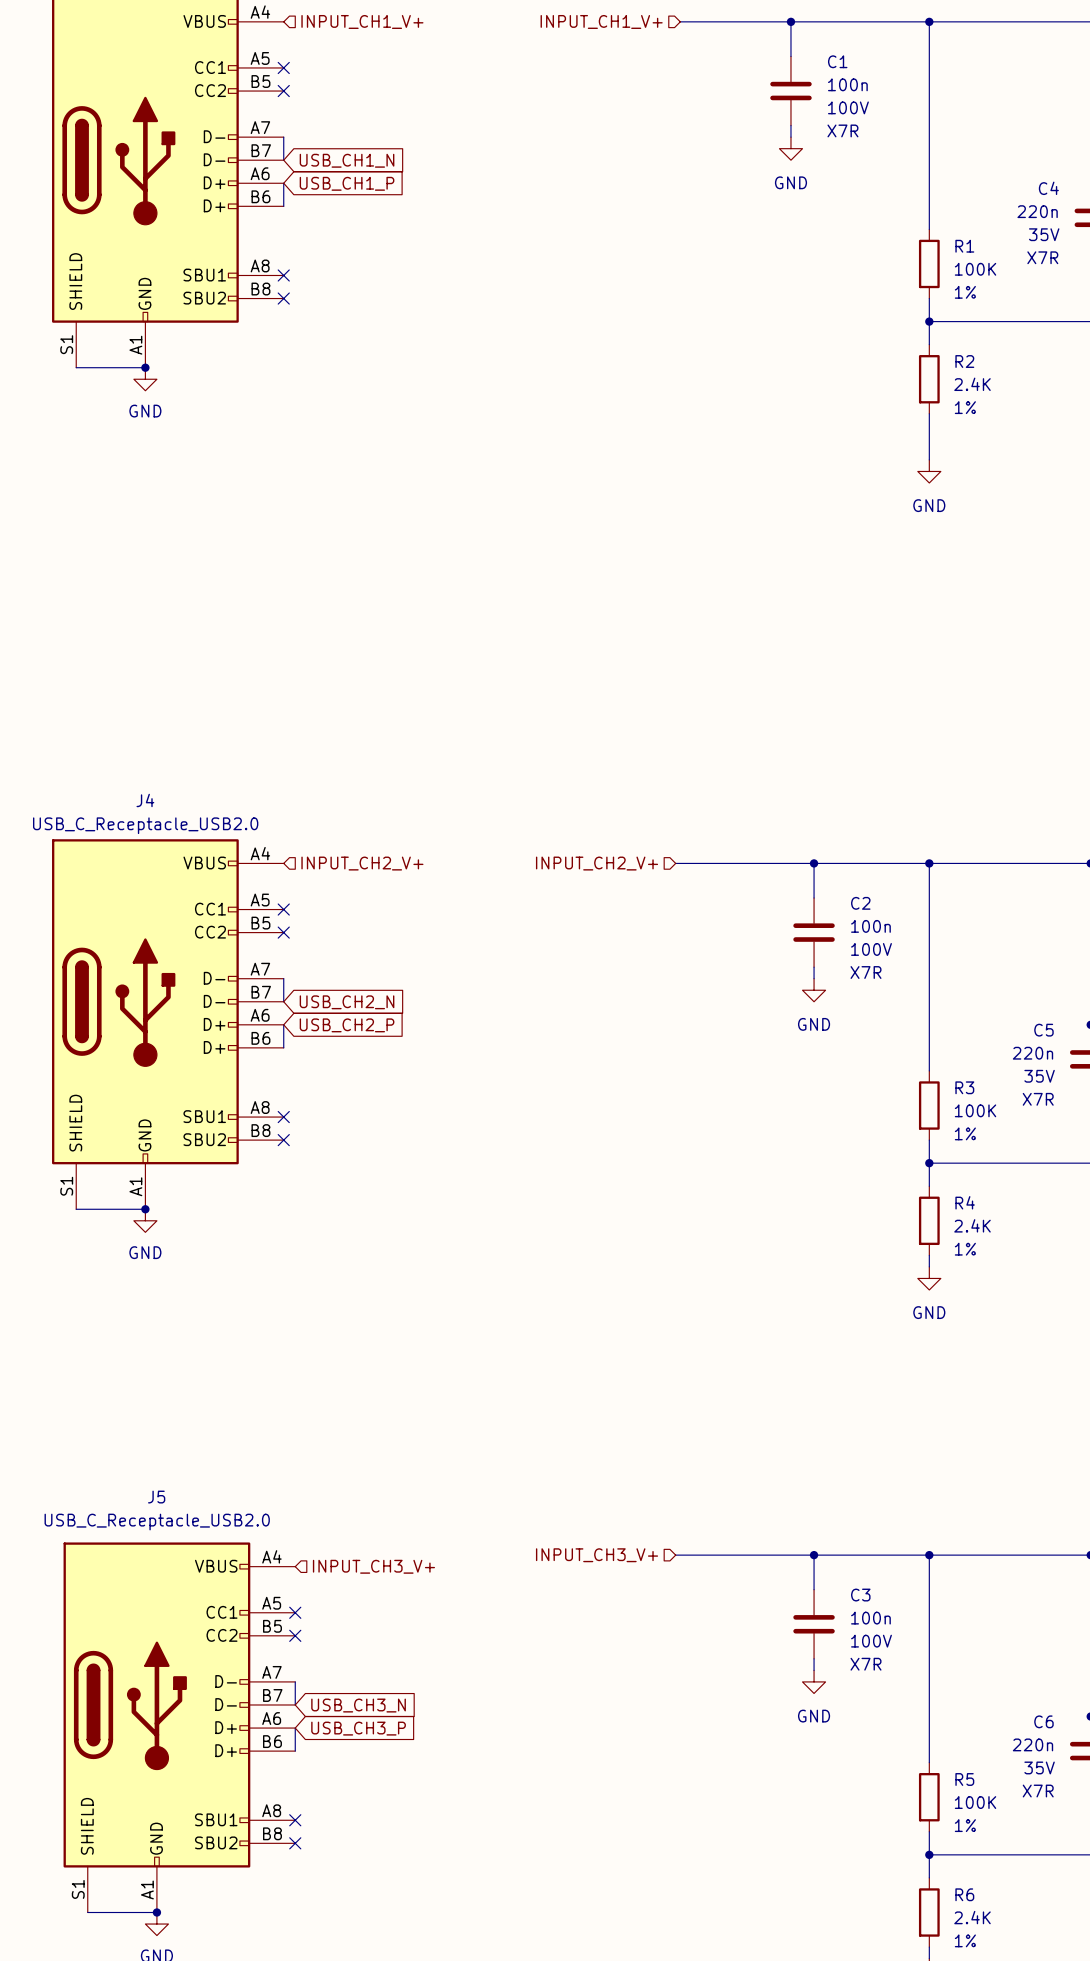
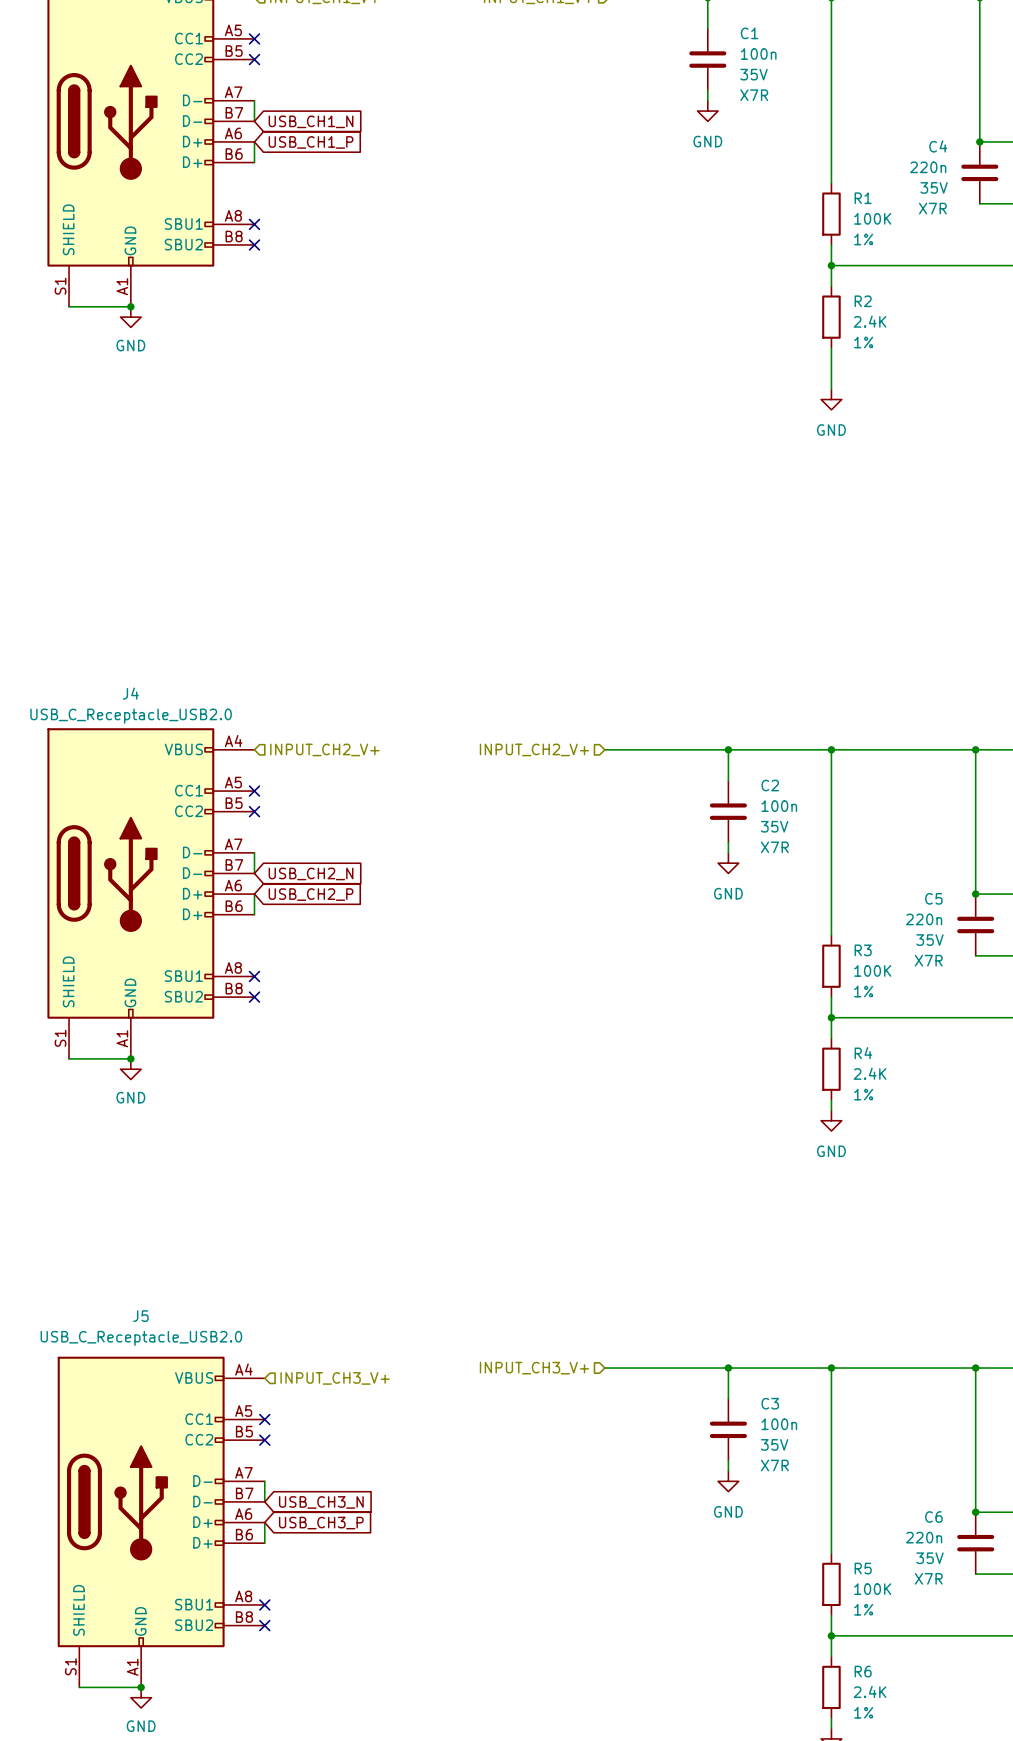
C1 text: 100V (848, 107) -> 35V (754, 74)
C2 text: 100V (871, 949) -> 35V (774, 826)
C3 text: 100V (871, 1641) -> 35V (774, 1444)

